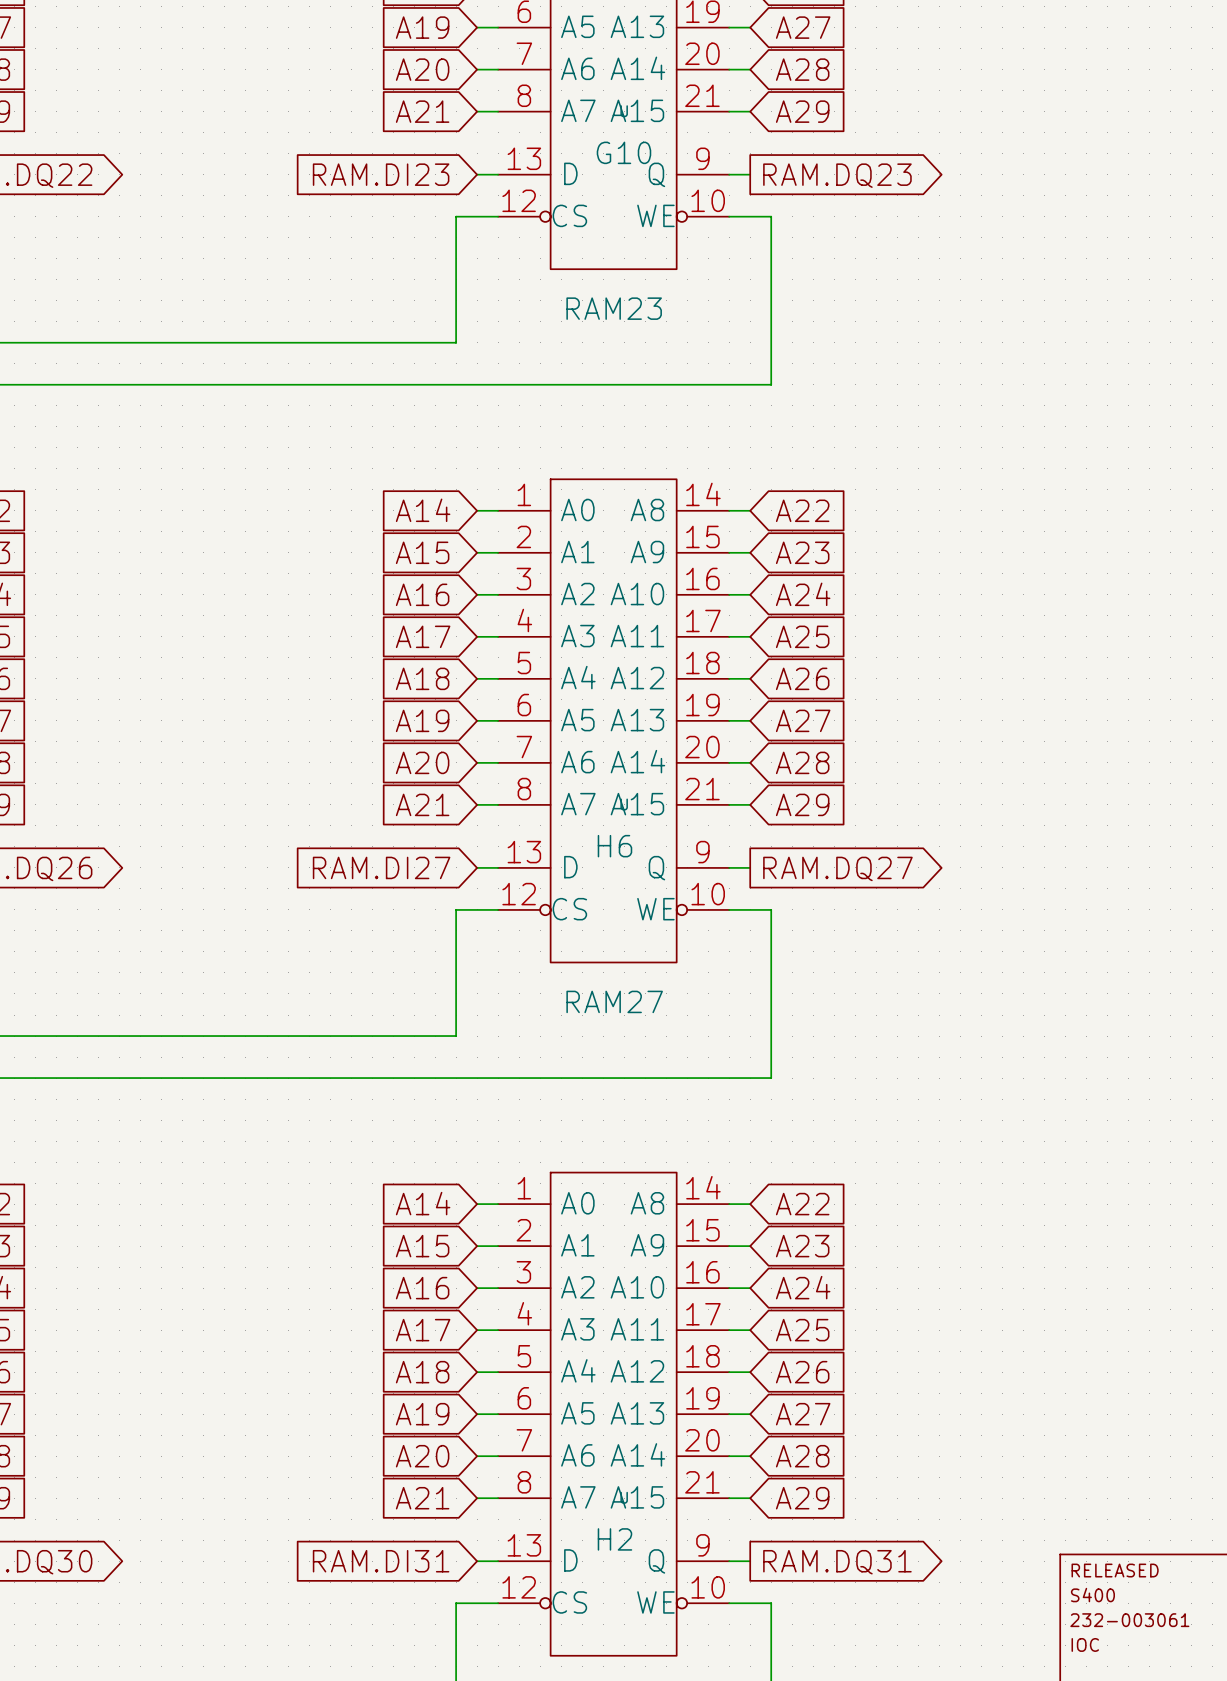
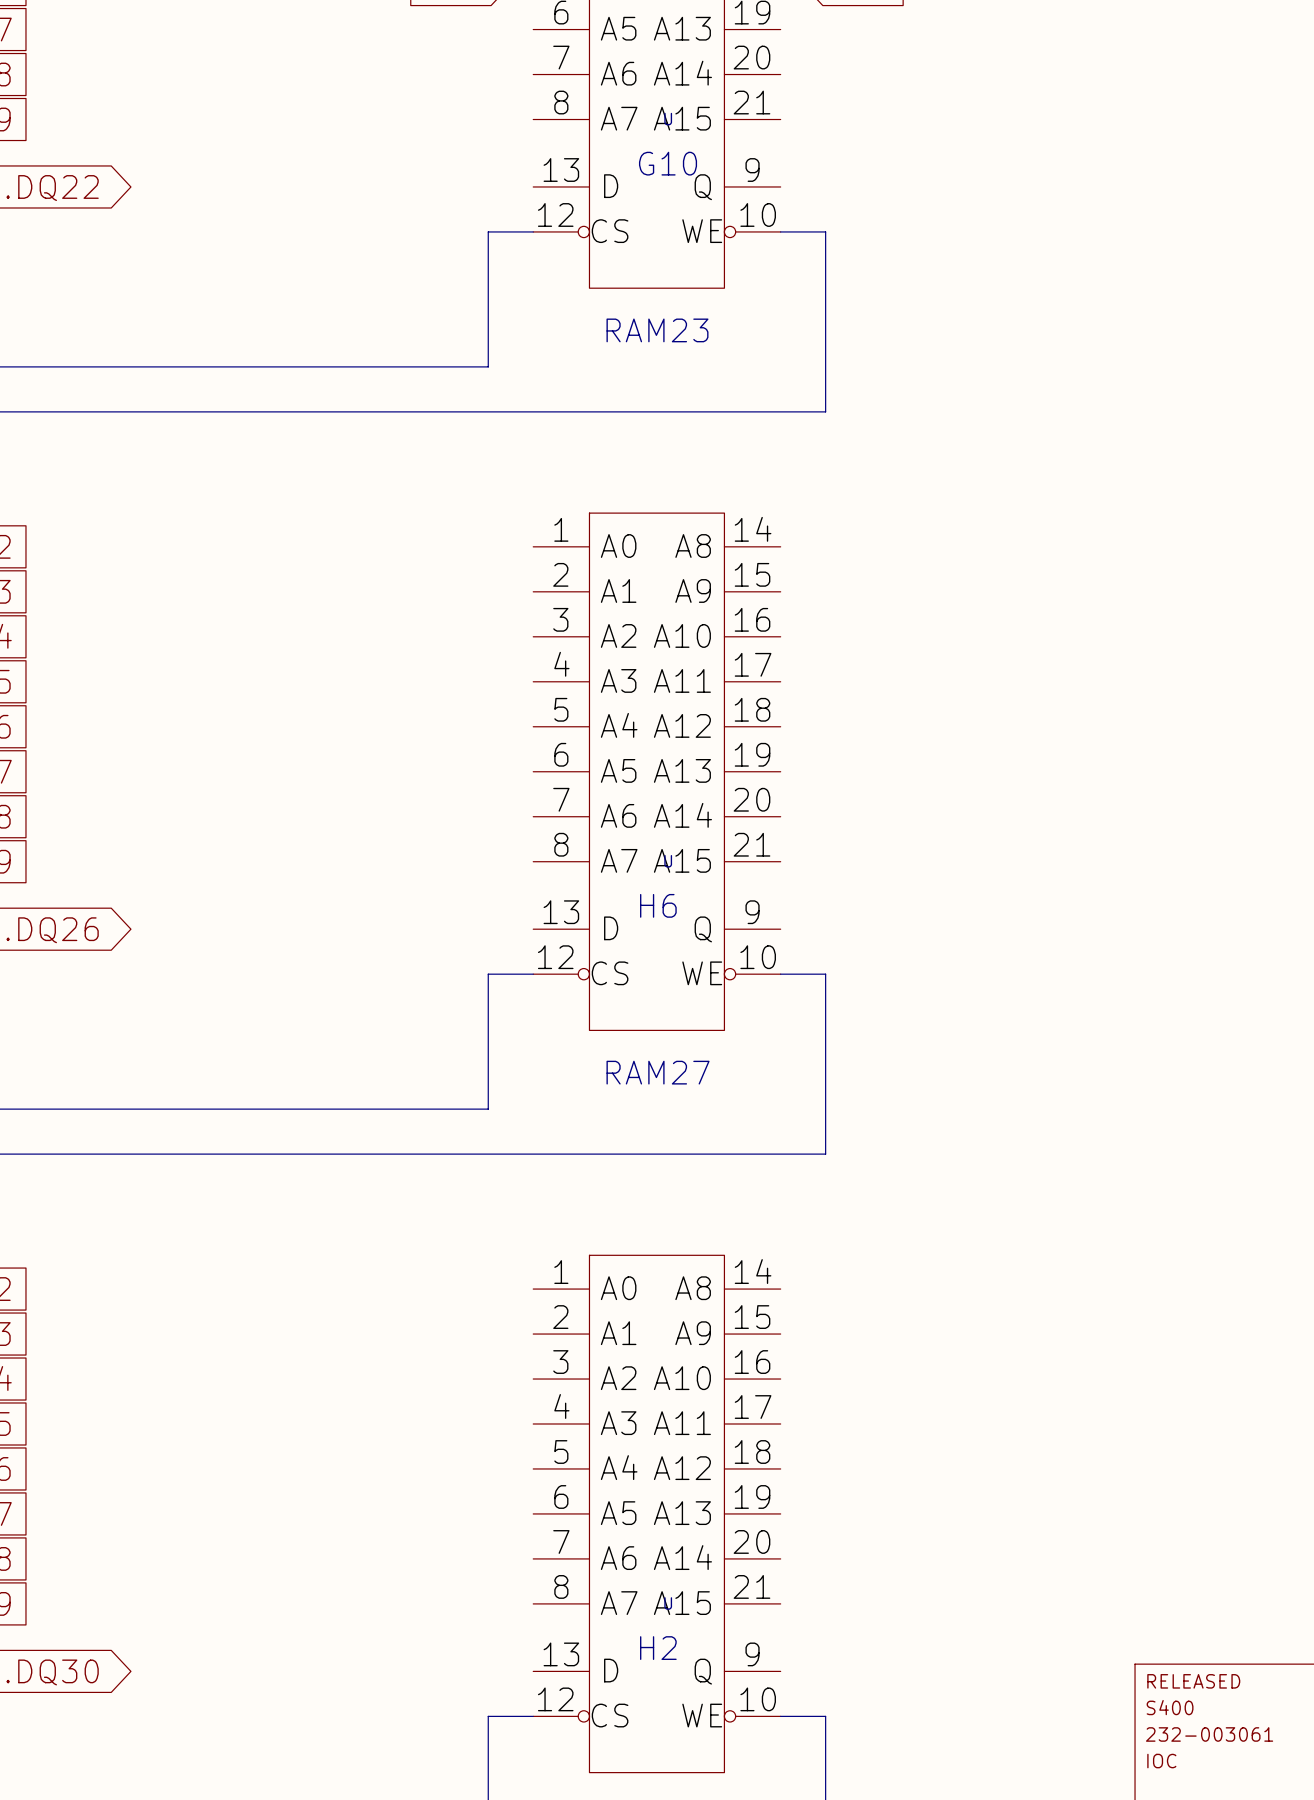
global label: A19 (422, 27) -> none
wire: (477, 27) (498, 27) -> none
wire: (729, 27) (750, 27) -> none
global label: A27 (803, 27) -> none
global label: A20 (422, 69) -> none
wire: (477, 69) (498, 69) -> none
wire: (729, 69) (750, 69) -> none
global label: A28 (802, 69) -> none
global label: A21 (422, 111) -> none
wire: (477, 111) (498, 111) -> none
wire: (729, 111) (750, 111) -> none
global label: A29 (802, 111) -> none
global label: RAM.DI23 (381, 174) -> none
wire: (477, 174) (498, 174) -> none
wire: (729, 174) (750, 174) -> none
global label: RAM.DQ23 (837, 175) -> none
global label: A14 (423, 510) -> none
wire: (477, 510) (498, 510) -> none
wire: (729, 510) (750, 510) -> none
global label: A22 (802, 510) -> none
global label: A15 (422, 552) -> none
wire: (477, 552) (498, 552) -> none
wire: (729, 552) (750, 552) -> none
global label: A23 (802, 552) -> none
global label: A16 (422, 594) -> none
wire: (477, 594) (498, 594) -> none
wire: (729, 594) (750, 594) -> none
global label: A24 (803, 594) -> none
global label: A17 (423, 636) -> none
wire: (477, 636) (498, 636) -> none
wire: (729, 636) (750, 636) -> none
global label: A25 (802, 636) -> none
global label: A18 (422, 678) -> none
wire: (477, 678) (498, 678) -> none
wire: (729, 678) (750, 678) -> none
global label: A26 (802, 678) -> none
global label: A19 (422, 720) -> none
wire: (477, 720) (498, 720) -> none
wire: (729, 720) (750, 720) -> none
global label: A27 (803, 720) -> none
global label: A20 (422, 762) -> none
wire: (477, 762) (498, 762) -> none
wire: (729, 762) (750, 762) -> none
global label: A28 (802, 762) -> none
global label: A21 (422, 804) -> none
wire: (477, 804) (498, 804) -> none
wire: (729, 804) (750, 804) -> none
global label: A29 (802, 804) -> none
global label: RAM.DI27 (381, 867) -> none
wire: (477, 867) (498, 867) -> none
wire: (729, 867) (750, 867) -> none
global label: RAM.DQ27 (837, 868) -> none
global label: A14 (423, 1203) -> none
wire: (477, 1204) (498, 1204) -> none
wire: (729, 1204) (750, 1204) -> none
global label: A22 (802, 1204) -> none
global label: A15 (422, 1246) -> none
wire: (477, 1246) (498, 1246) -> none
wire: (729, 1246) (750, 1246) -> none
global label: A23 (802, 1246) -> none
global label: A24 (803, 1287) -> none
global label: A16 (422, 1288) -> none
wire: (477, 1288) (498, 1288) -> none
wire: (729, 1288) (750, 1288) -> none
global label: A17 (423, 1330) -> none
wire: (477, 1330) (498, 1330) -> none
wire: (729, 1330) (750, 1330) -> none
global label: A25 (802, 1330) -> none
global label: A18 (422, 1372) -> none
wire: (477, 1372) (498, 1372) -> none
wire: (729, 1372) (750, 1372) -> none
global label: A26 (802, 1372) -> none
global label: A19 (422, 1414) -> none
wire: (477, 1414) (498, 1414) -> none
wire: (729, 1414) (750, 1414) -> none
global label: A27 (803, 1414) -> none
global label: A20 (422, 1456) -> none
wire: (477, 1456) (498, 1456) -> none
wire: (729, 1456) (750, 1456) -> none
global label: A28 (802, 1456) -> none
global label: A21 (422, 1498) -> none
wire: (477, 1498) (498, 1498) -> none
wire: (729, 1498) (750, 1498) -> none
global label: A29 (802, 1498) -> none
global label: RAM.DI31 (381, 1561) -> none
wire: (477, 1561) (498, 1561) -> none
wire: (729, 1561) (750, 1561) -> none
global label: RAM.DQ31 (837, 1562) -> none

